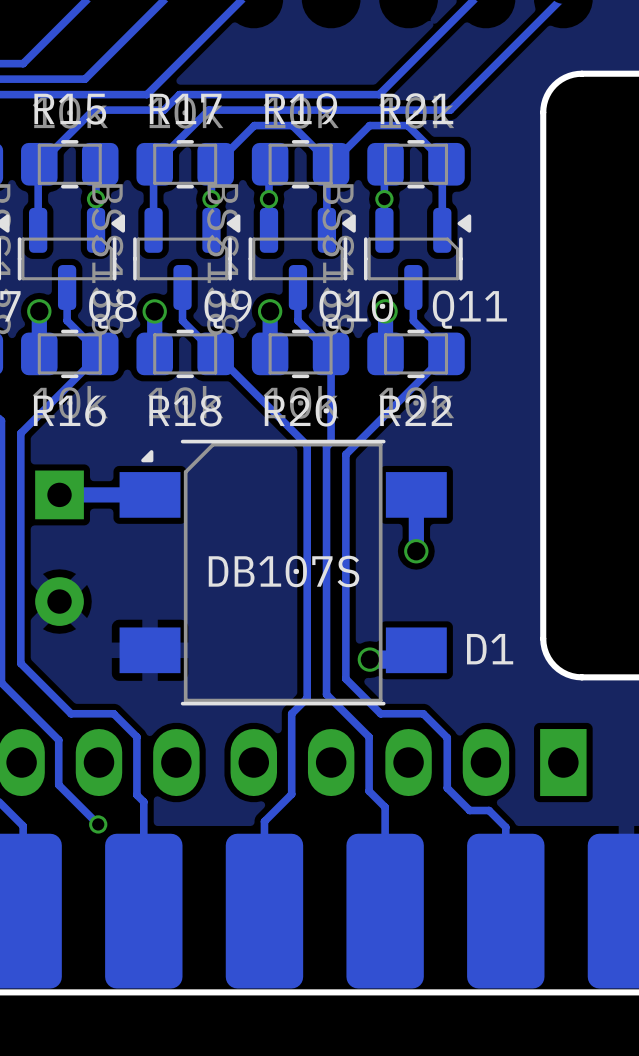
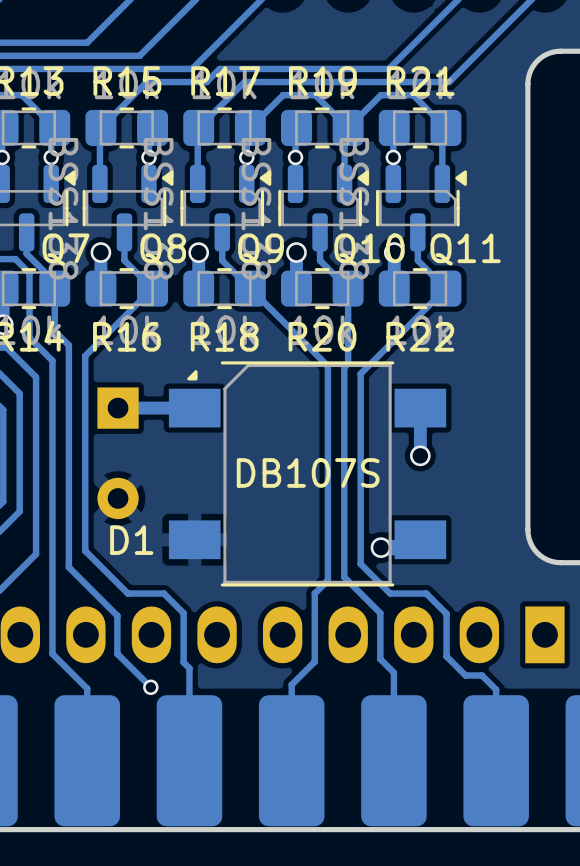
D1 name position: D1 (490, 649) -> D1 (131, 540)

